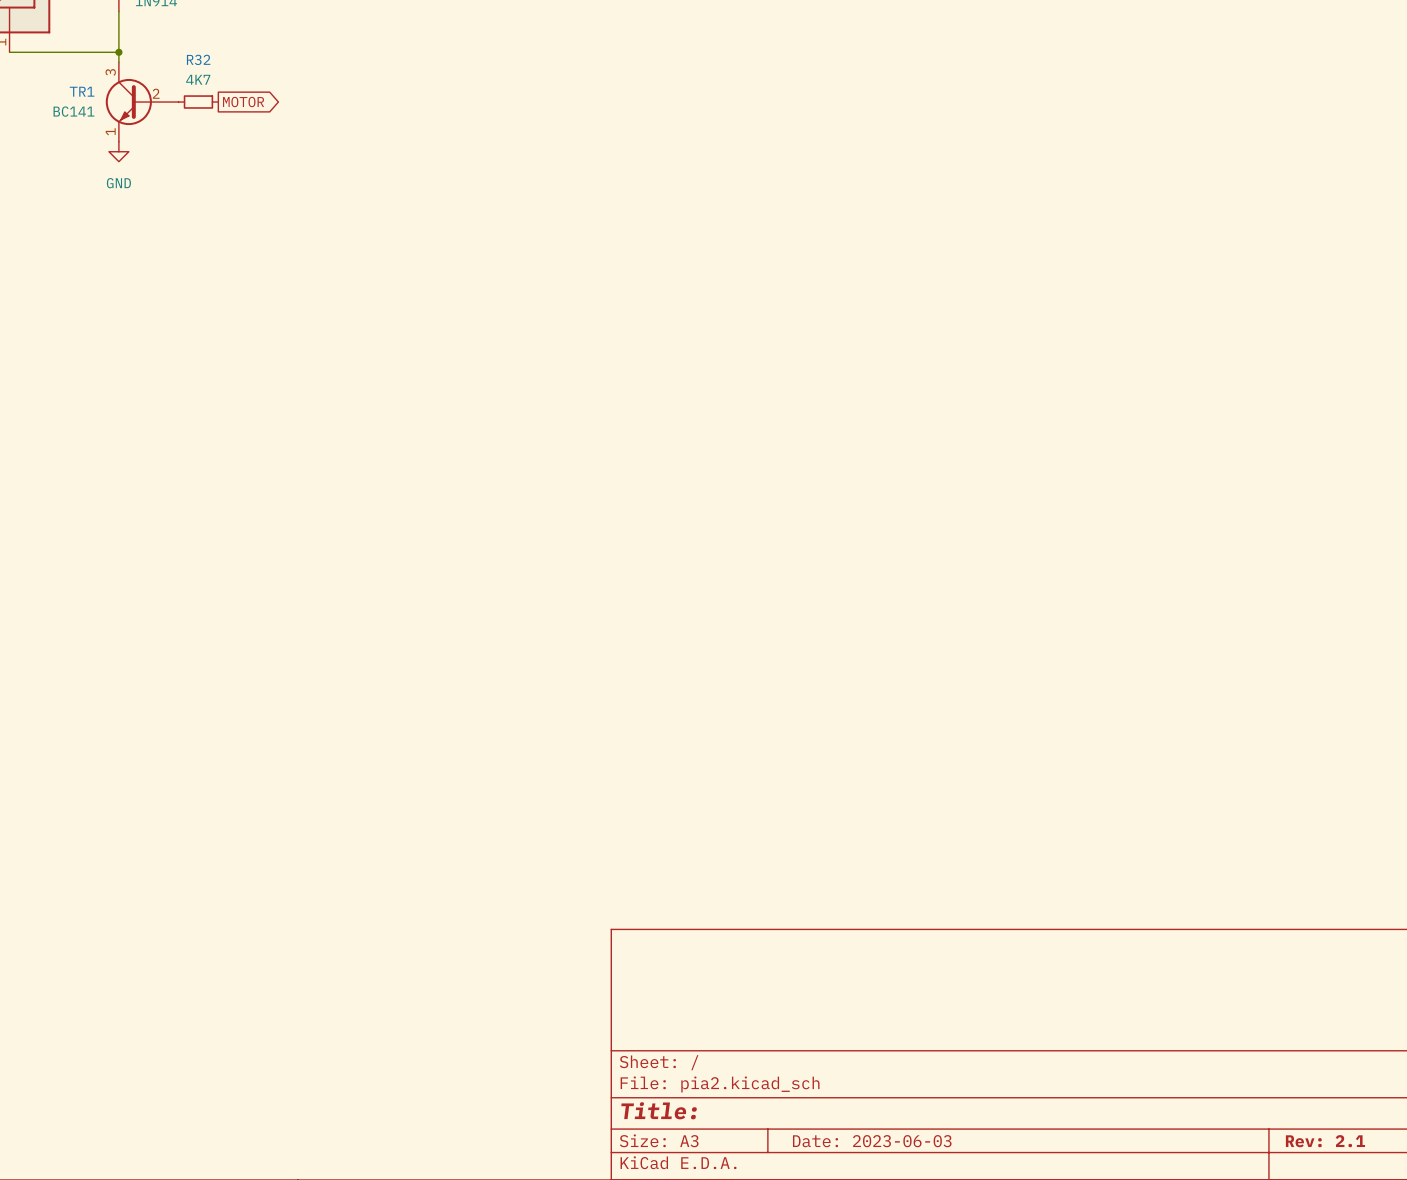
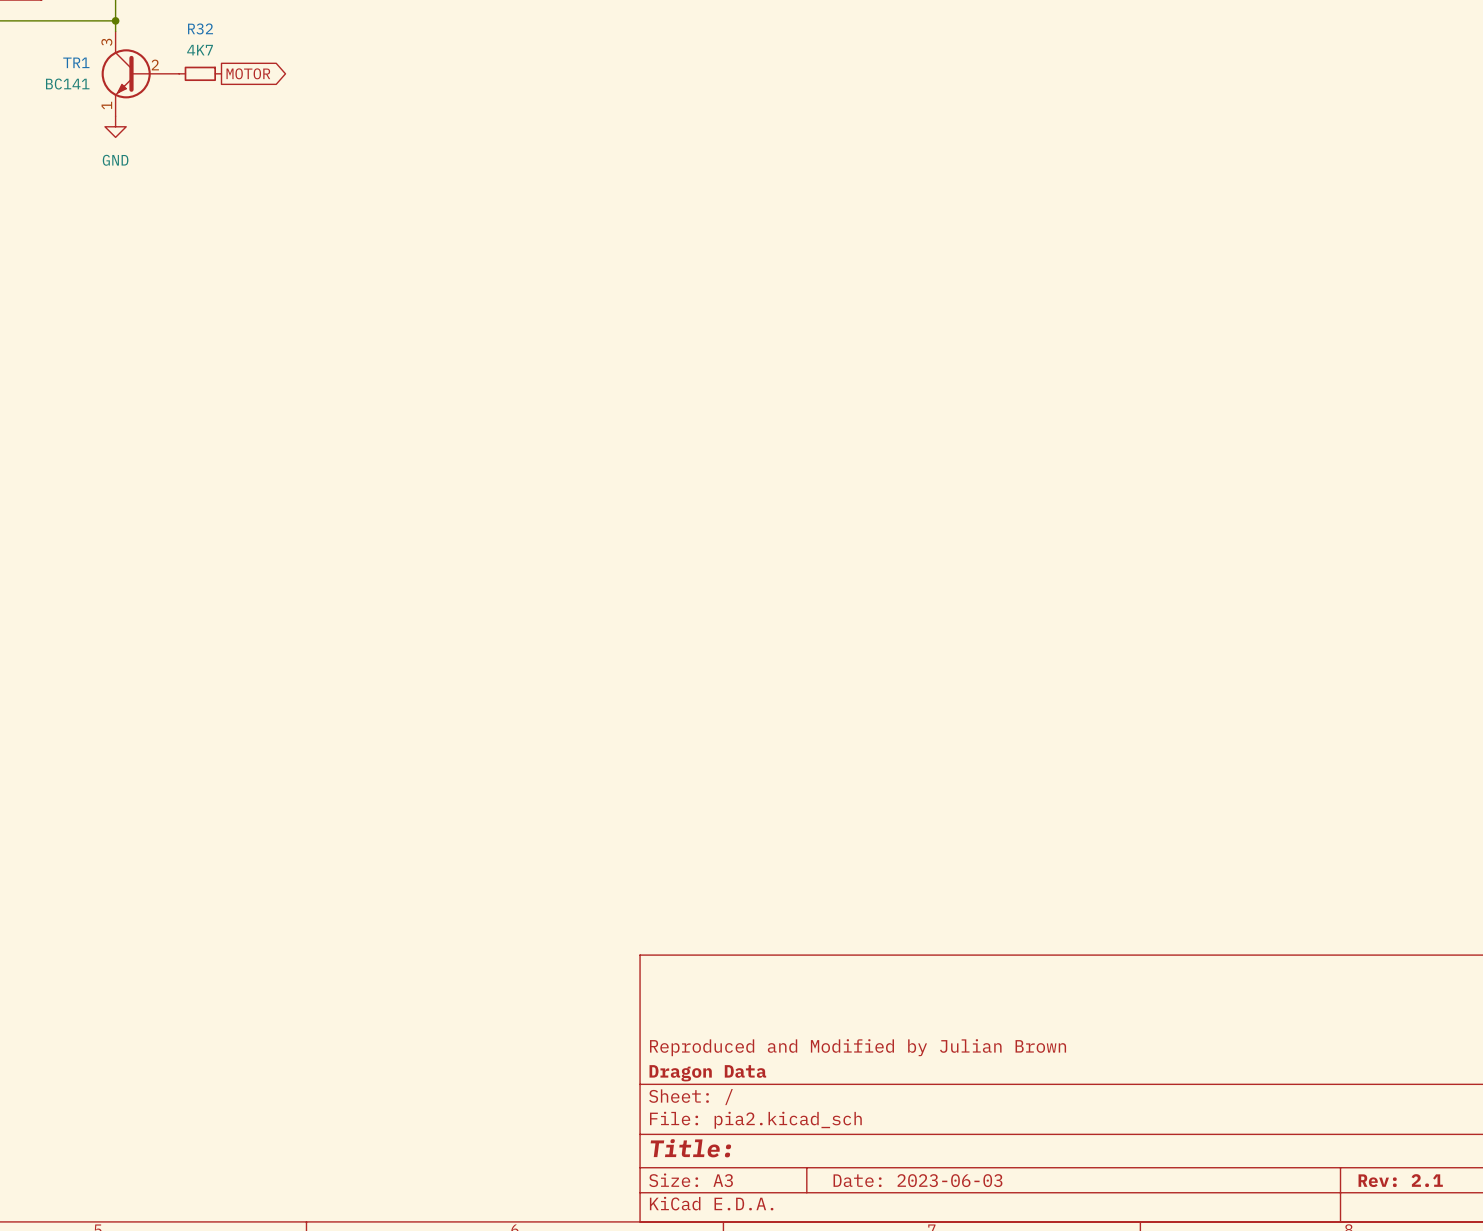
title block: none -> Reproduced and Modified by Julian Brown (858, 1047)
title block: none -> Dragon Data (707, 1073)

